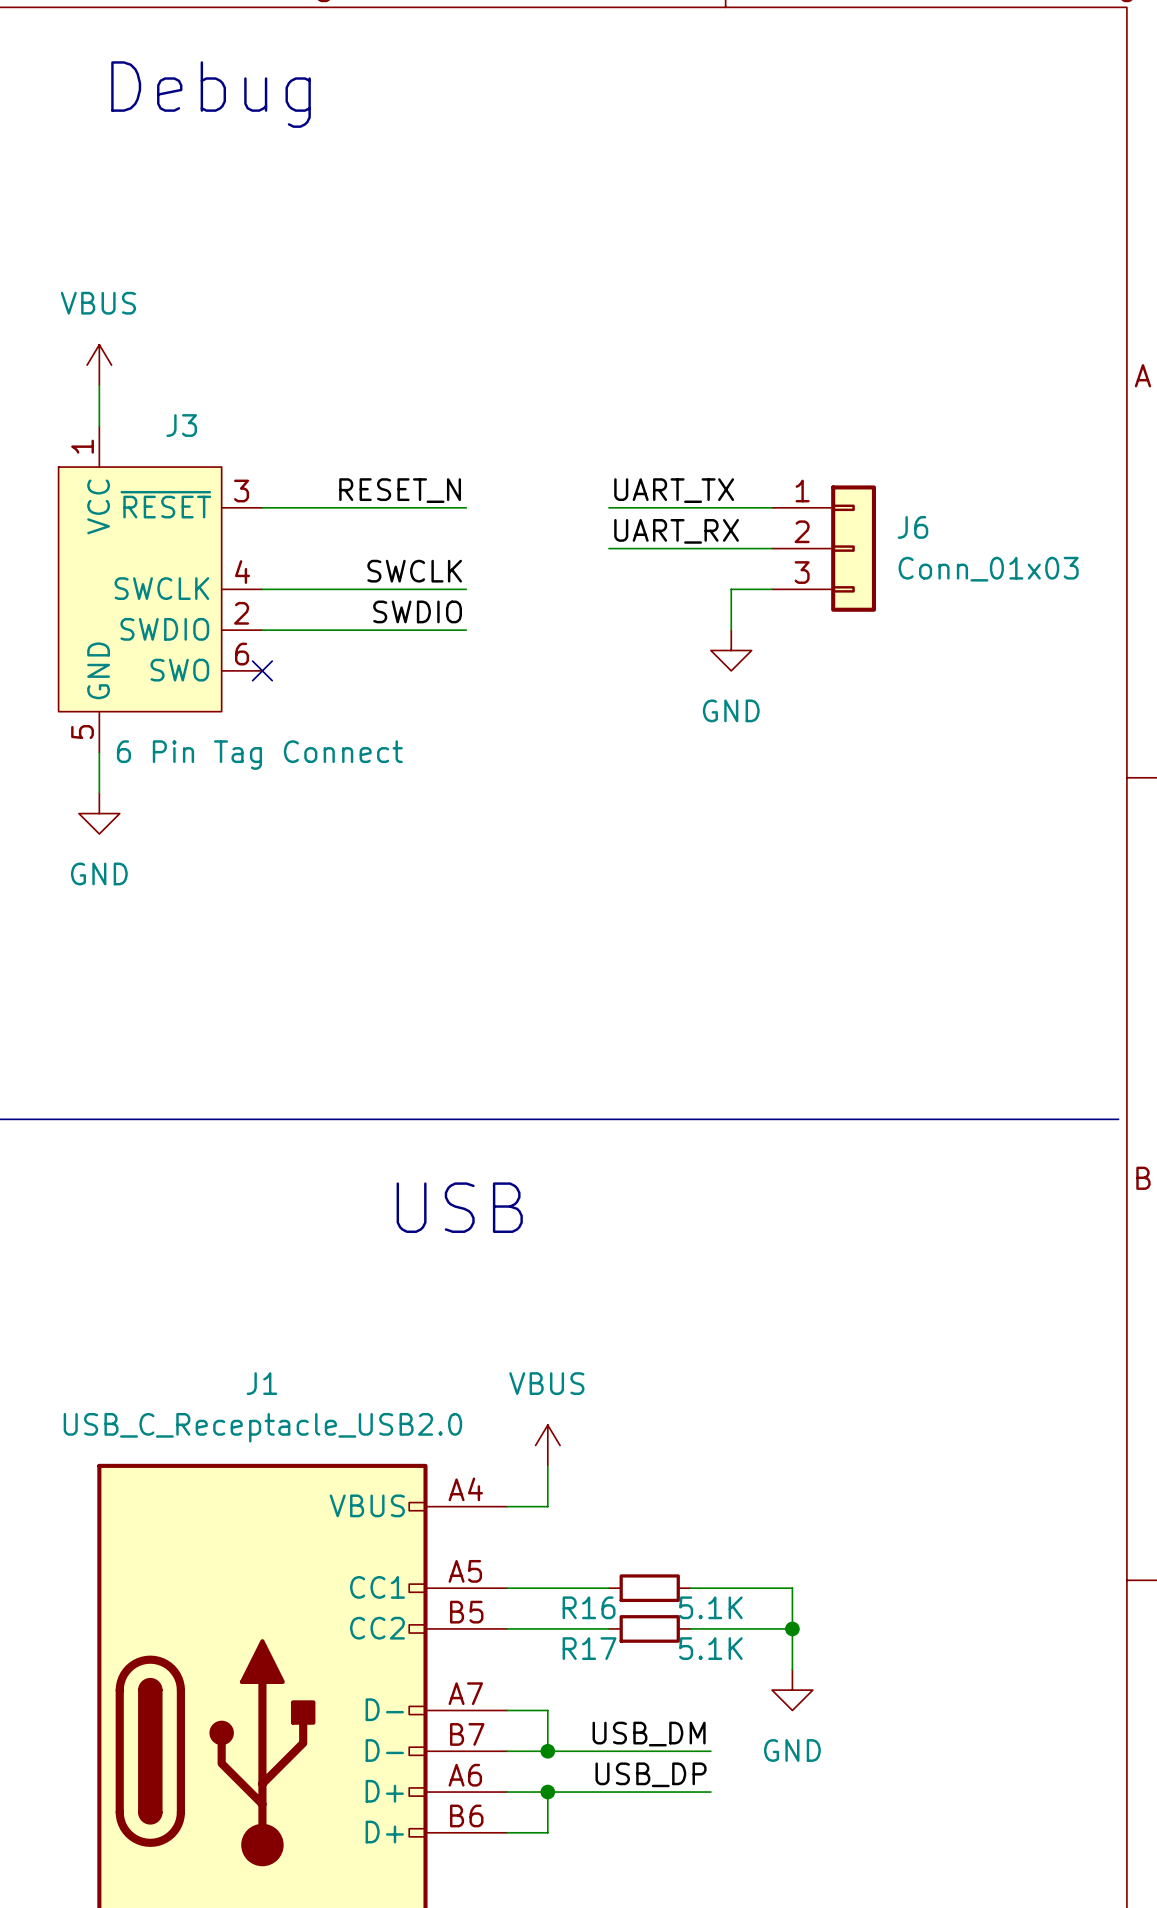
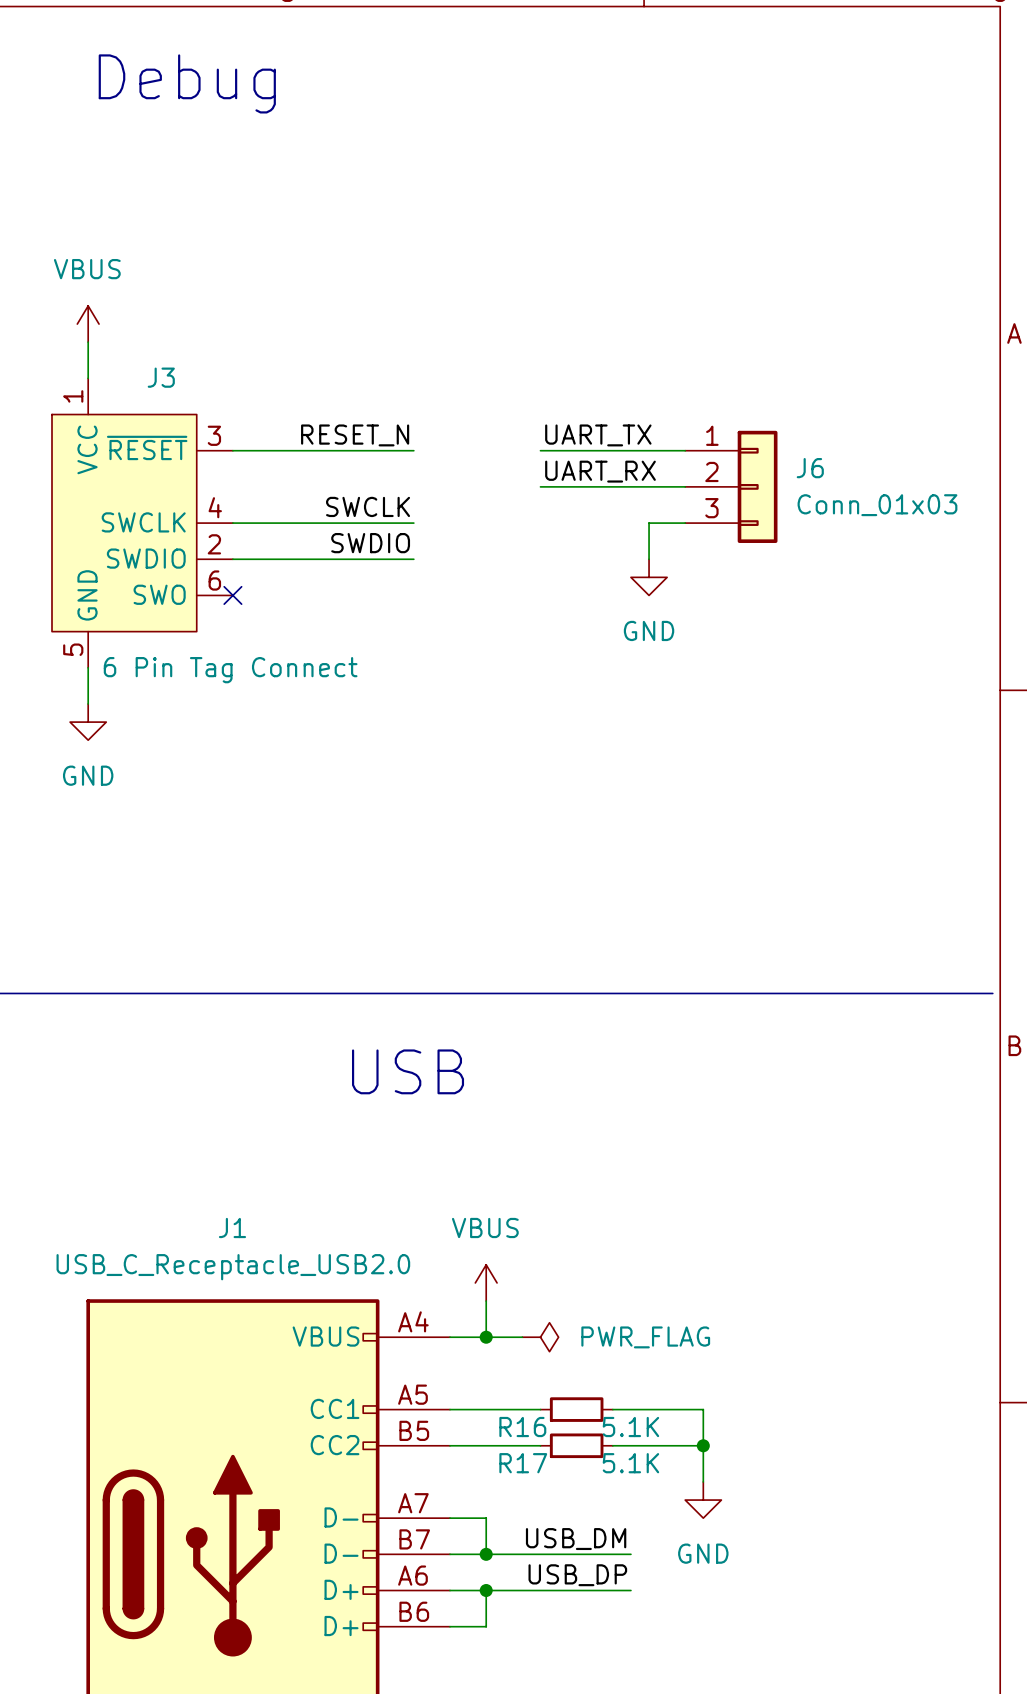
wire: none -> (486, 1337) (522, 1337)
junction: none -> (486, 1337)
power symbol: none -> PWR_FLAG (540, 1337)

